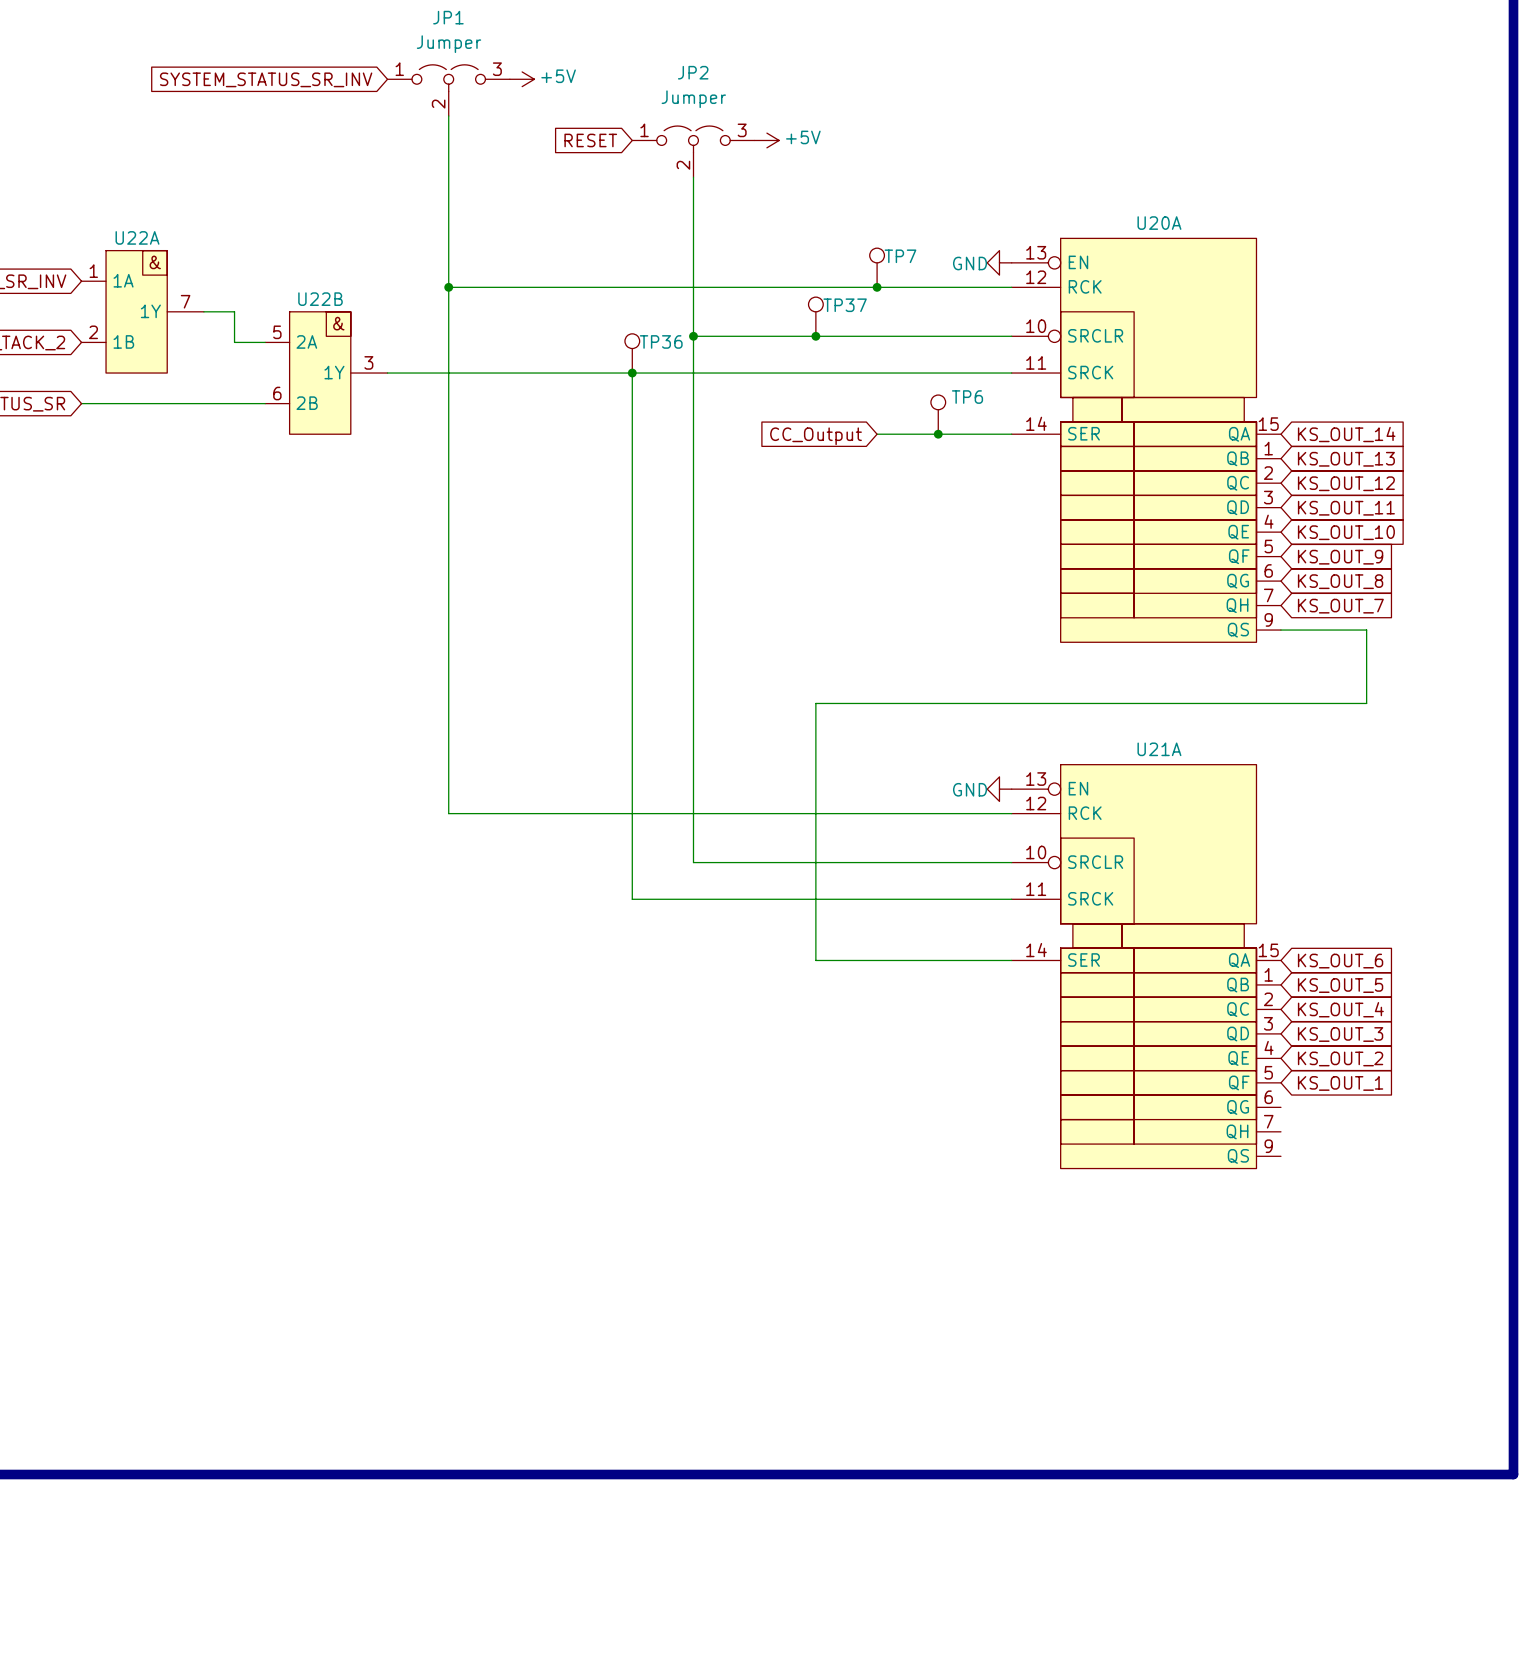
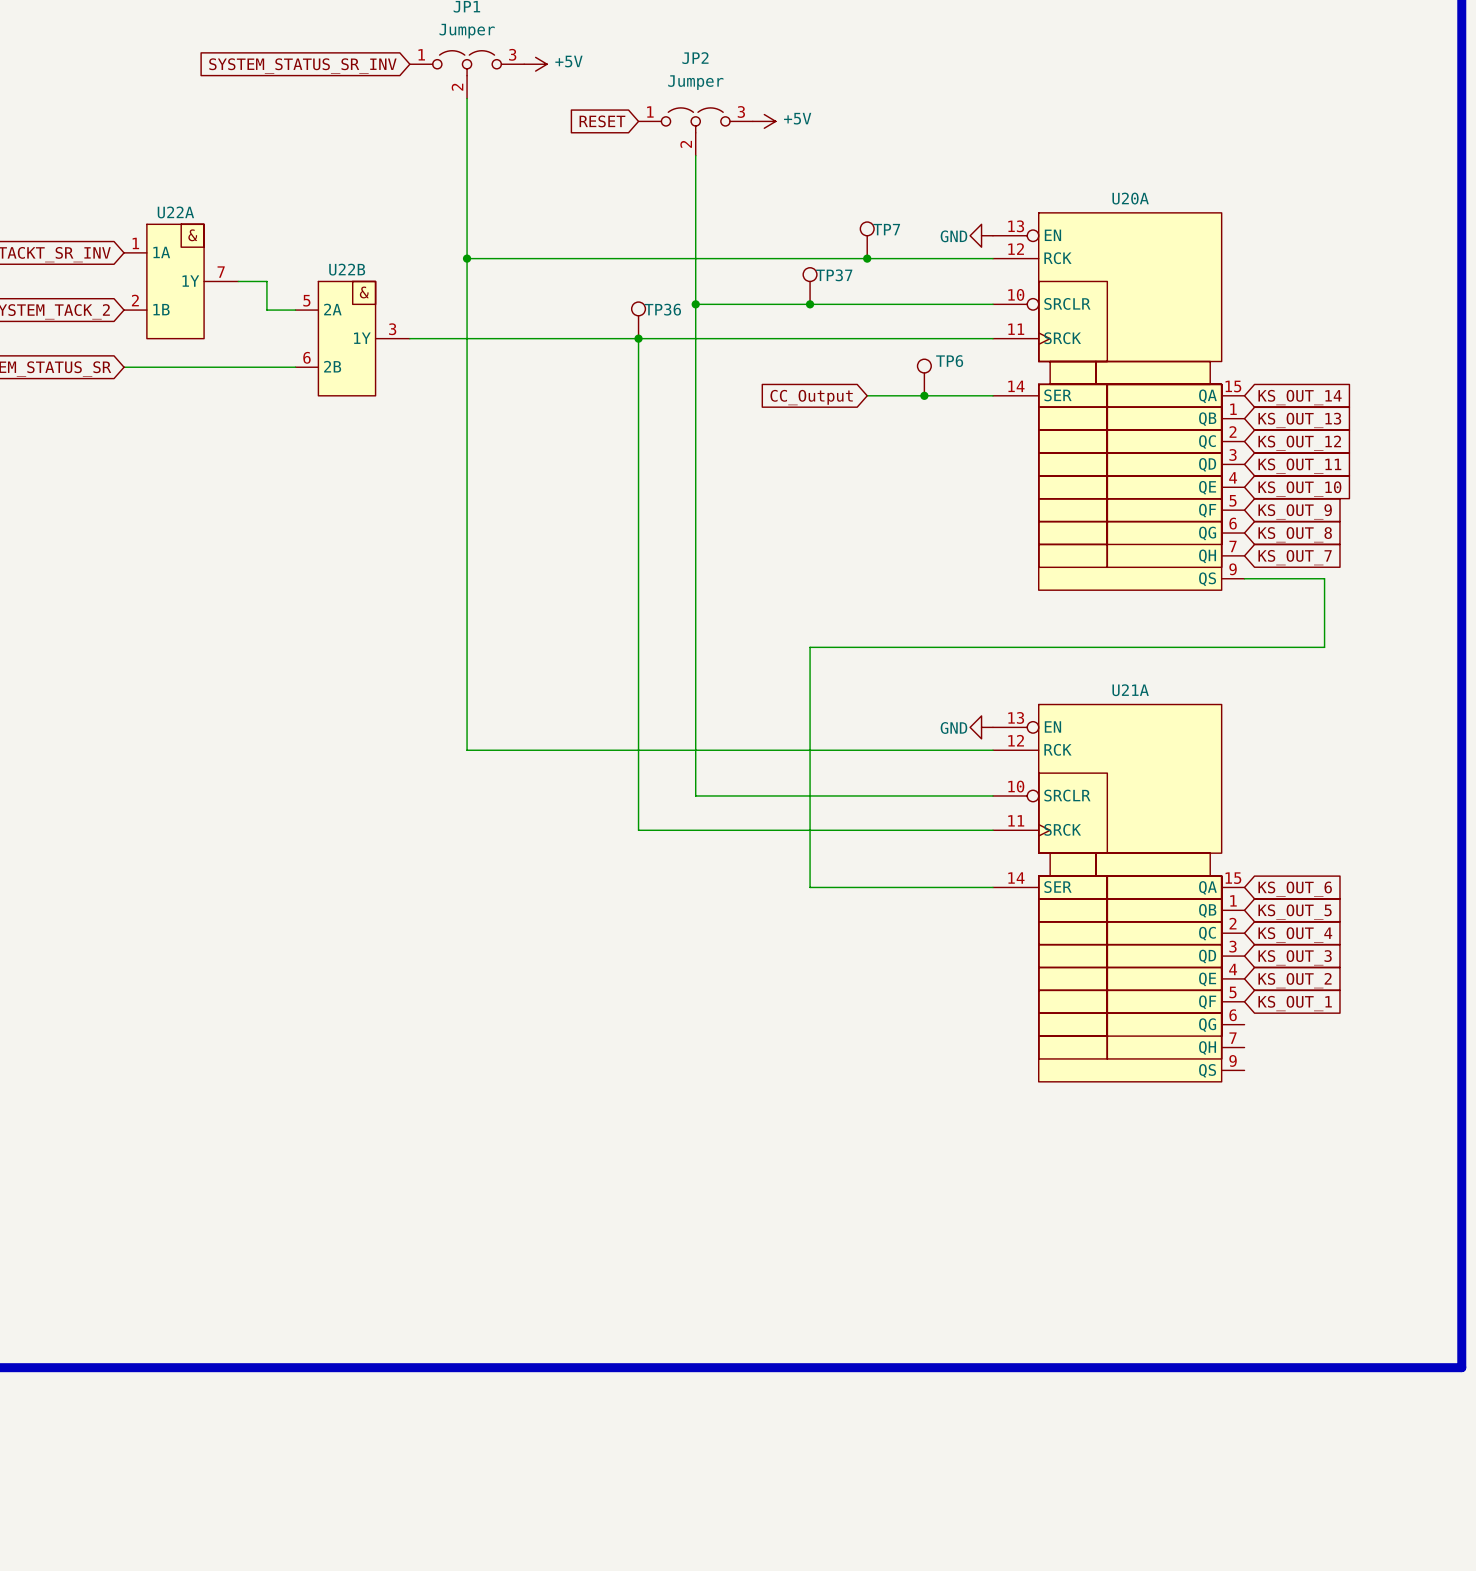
U20A symbol: [1011, 238, 1281, 643] -> [992, 212, 1245, 591]
U21A symbol: [1011, 764, 1281, 1169] -> [992, 704, 1245, 1082]

